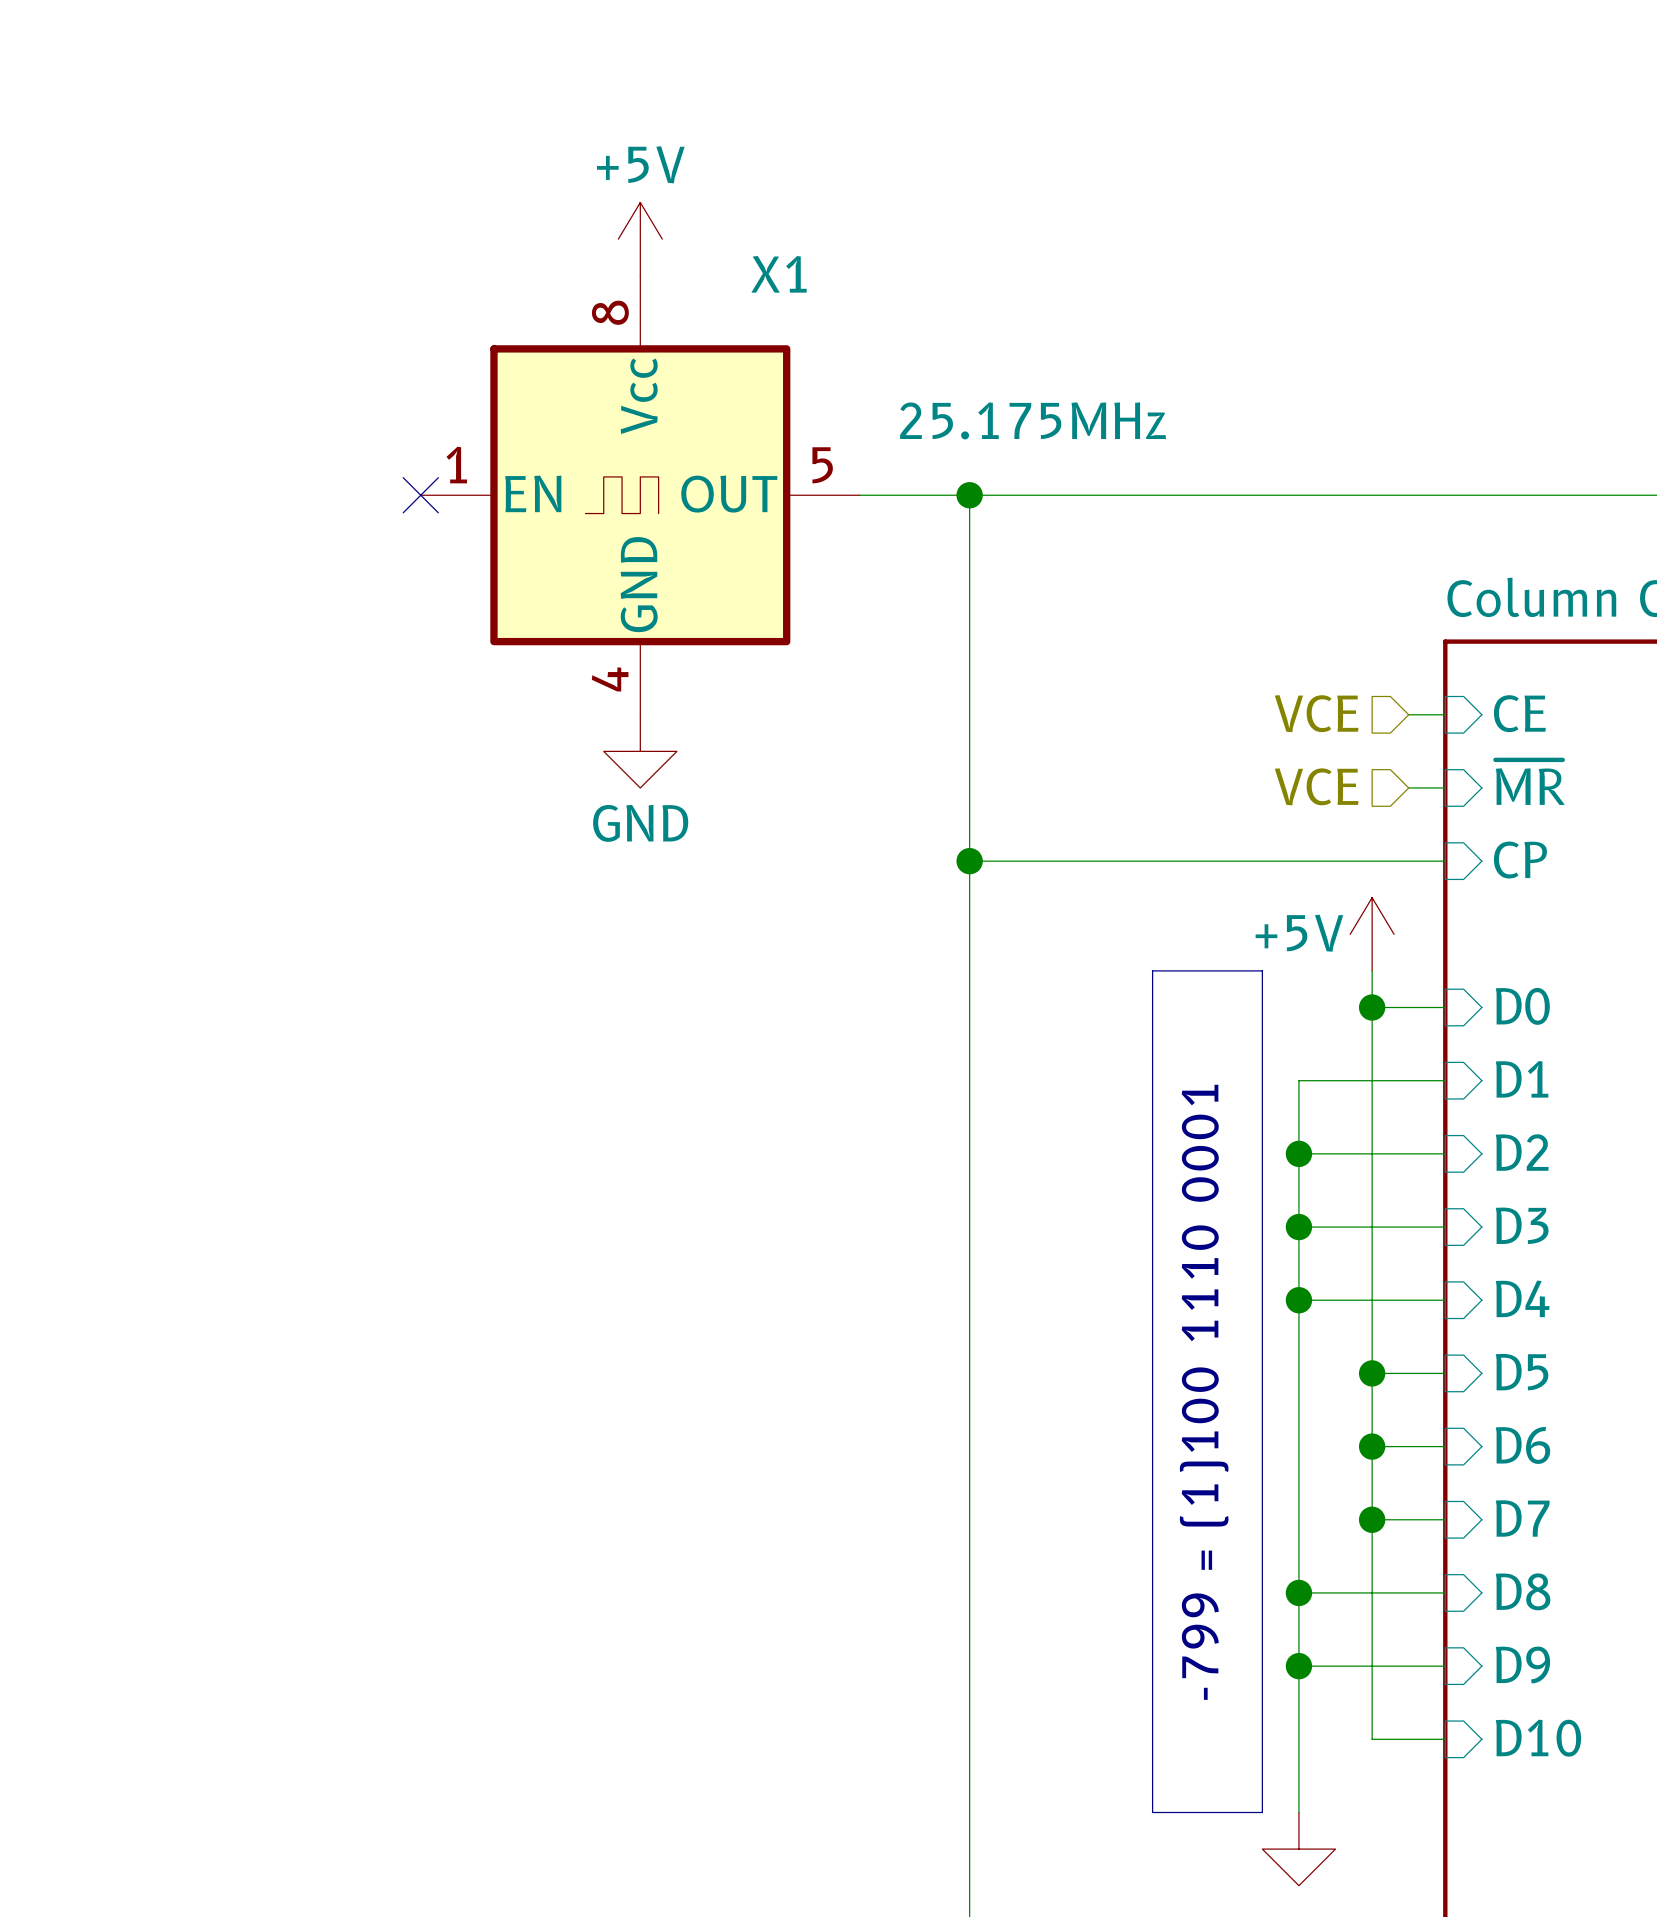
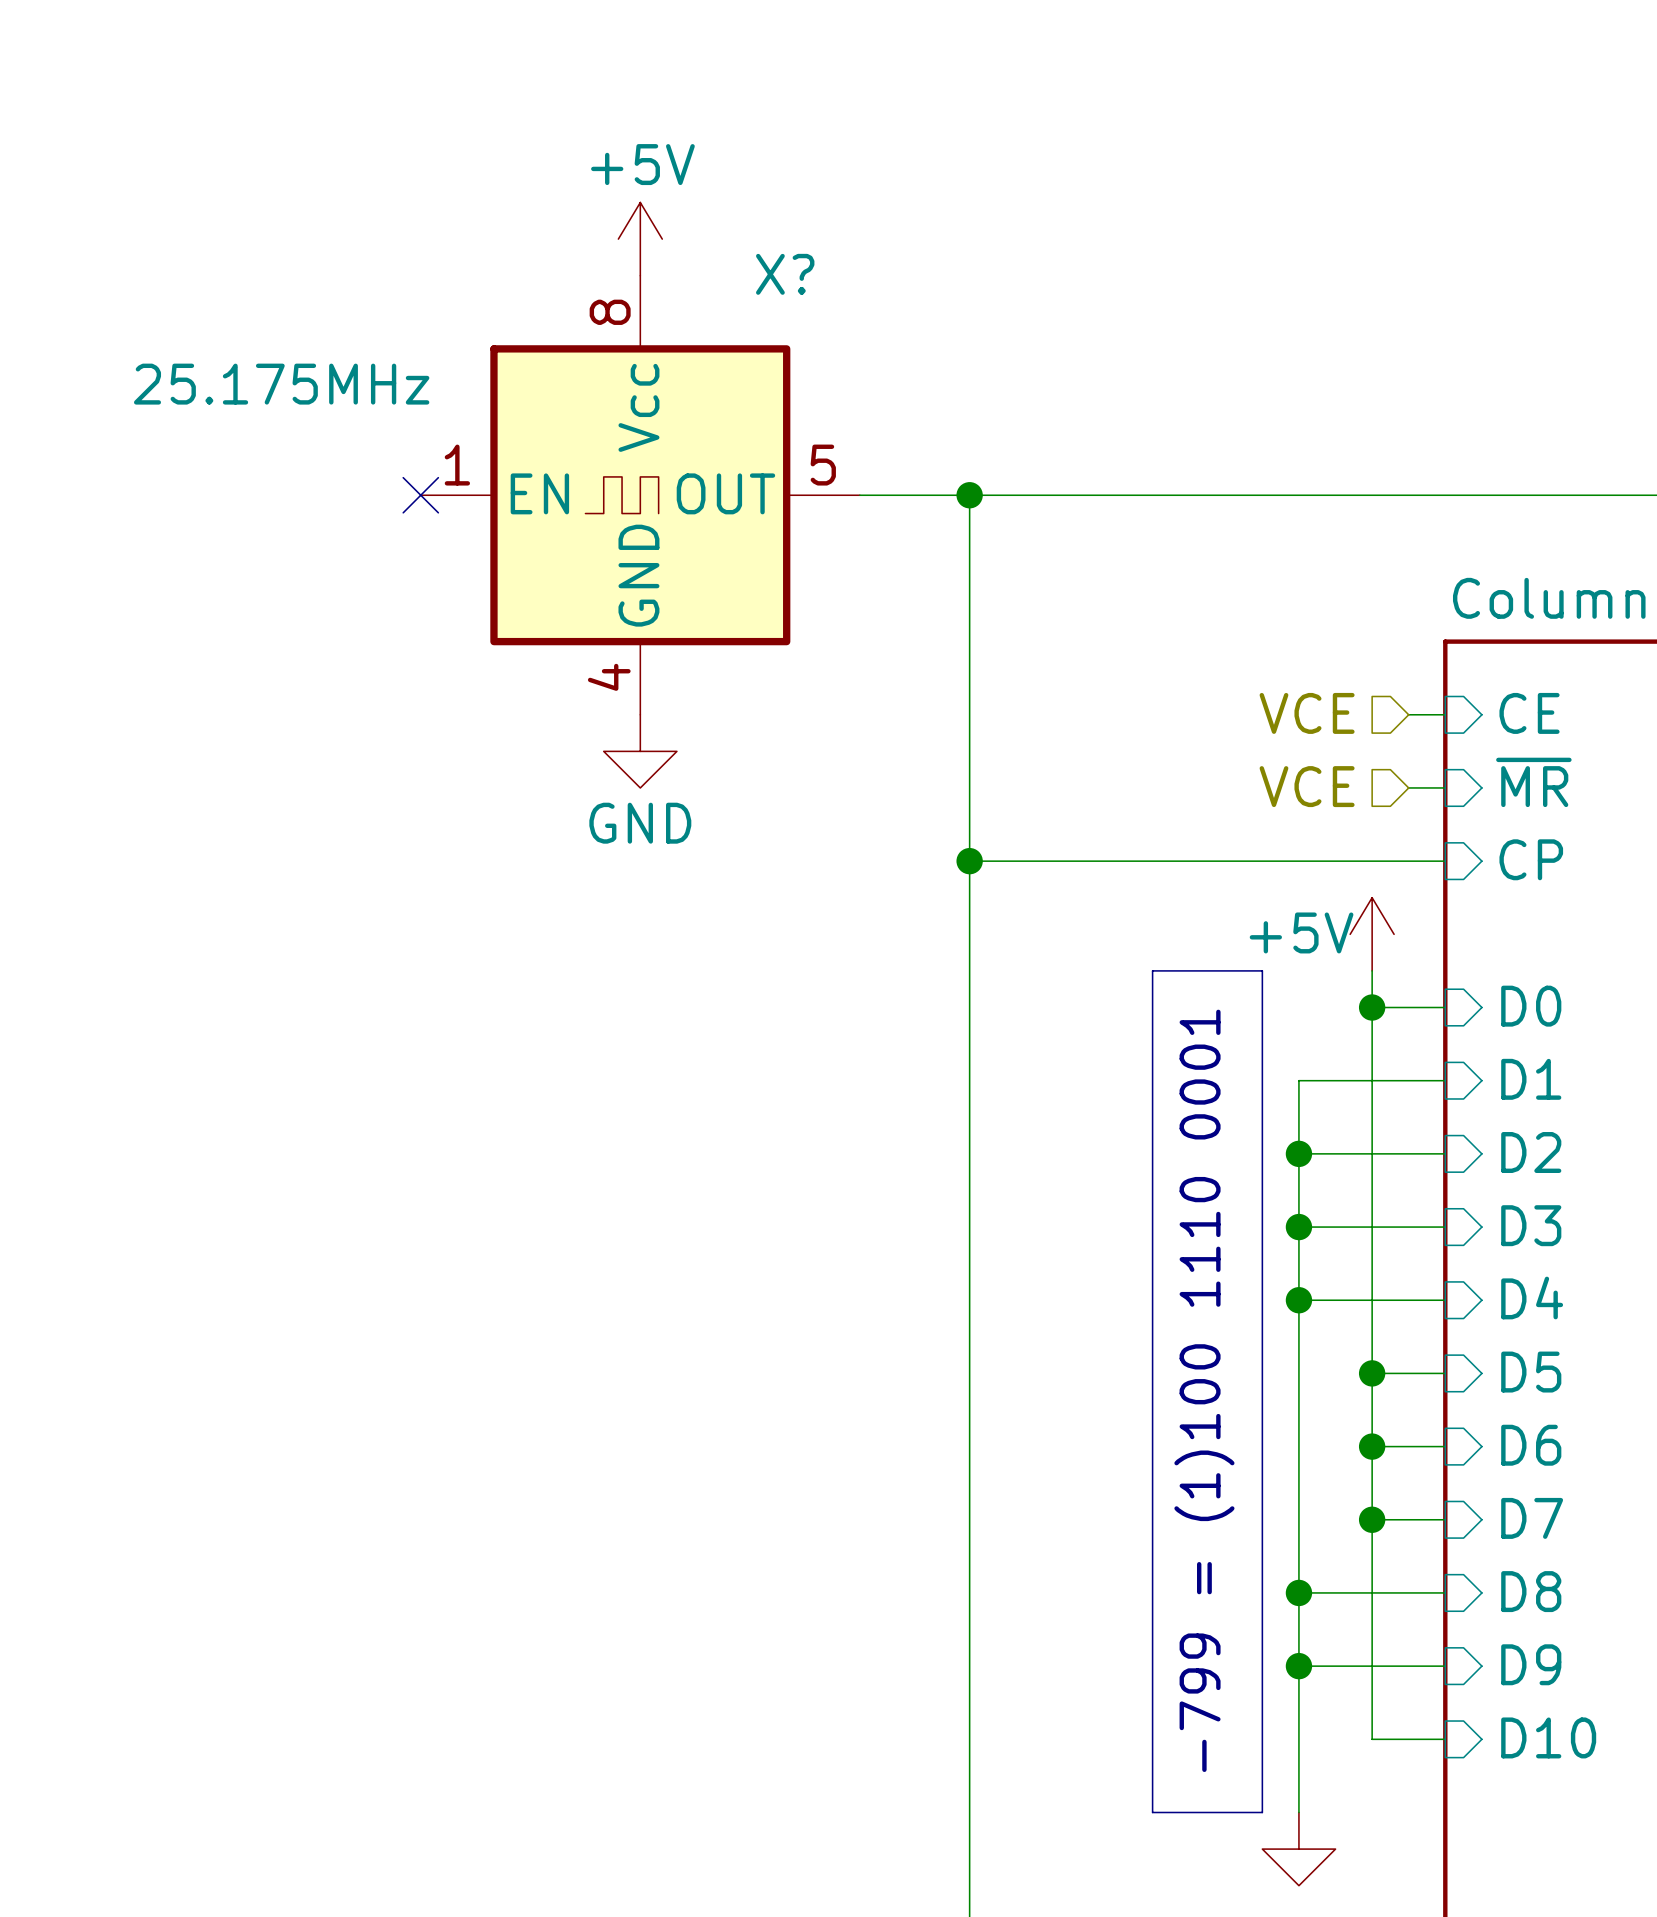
X1 name: X1 (779, 274) -> X? (785, 274)
X1 value position: 25.175MHz (1033, 420) -> 25.175MHz (281, 384)

